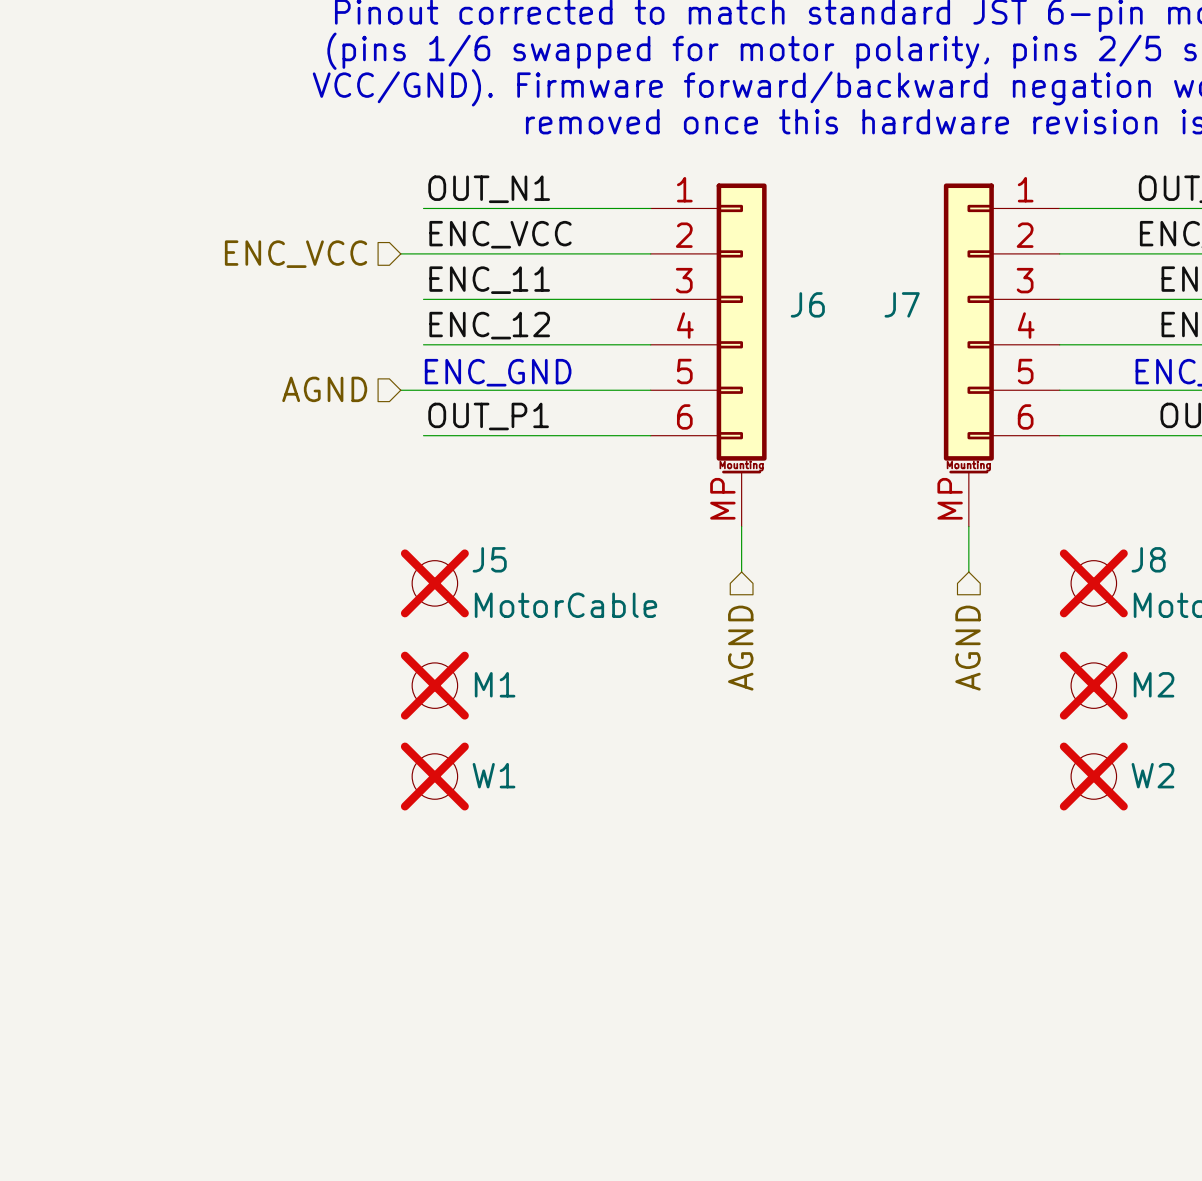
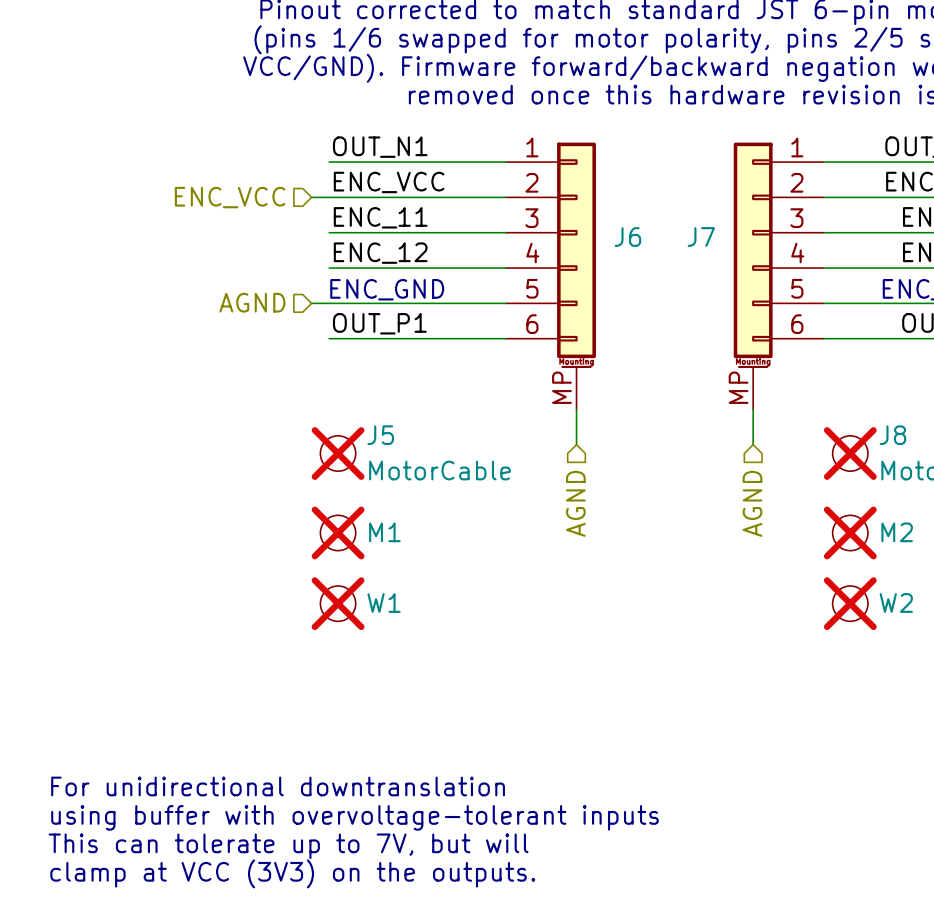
text: none -> For unidirectional downtranslation (278, 786)
text: none -> using buffer with overvoltage-tolerant inputs (355, 817)
text: none -> This can tolerate up to 7V, but will (288, 846)
text: none -> clamp at VCC (3V3) on the outputs. (292, 873)

